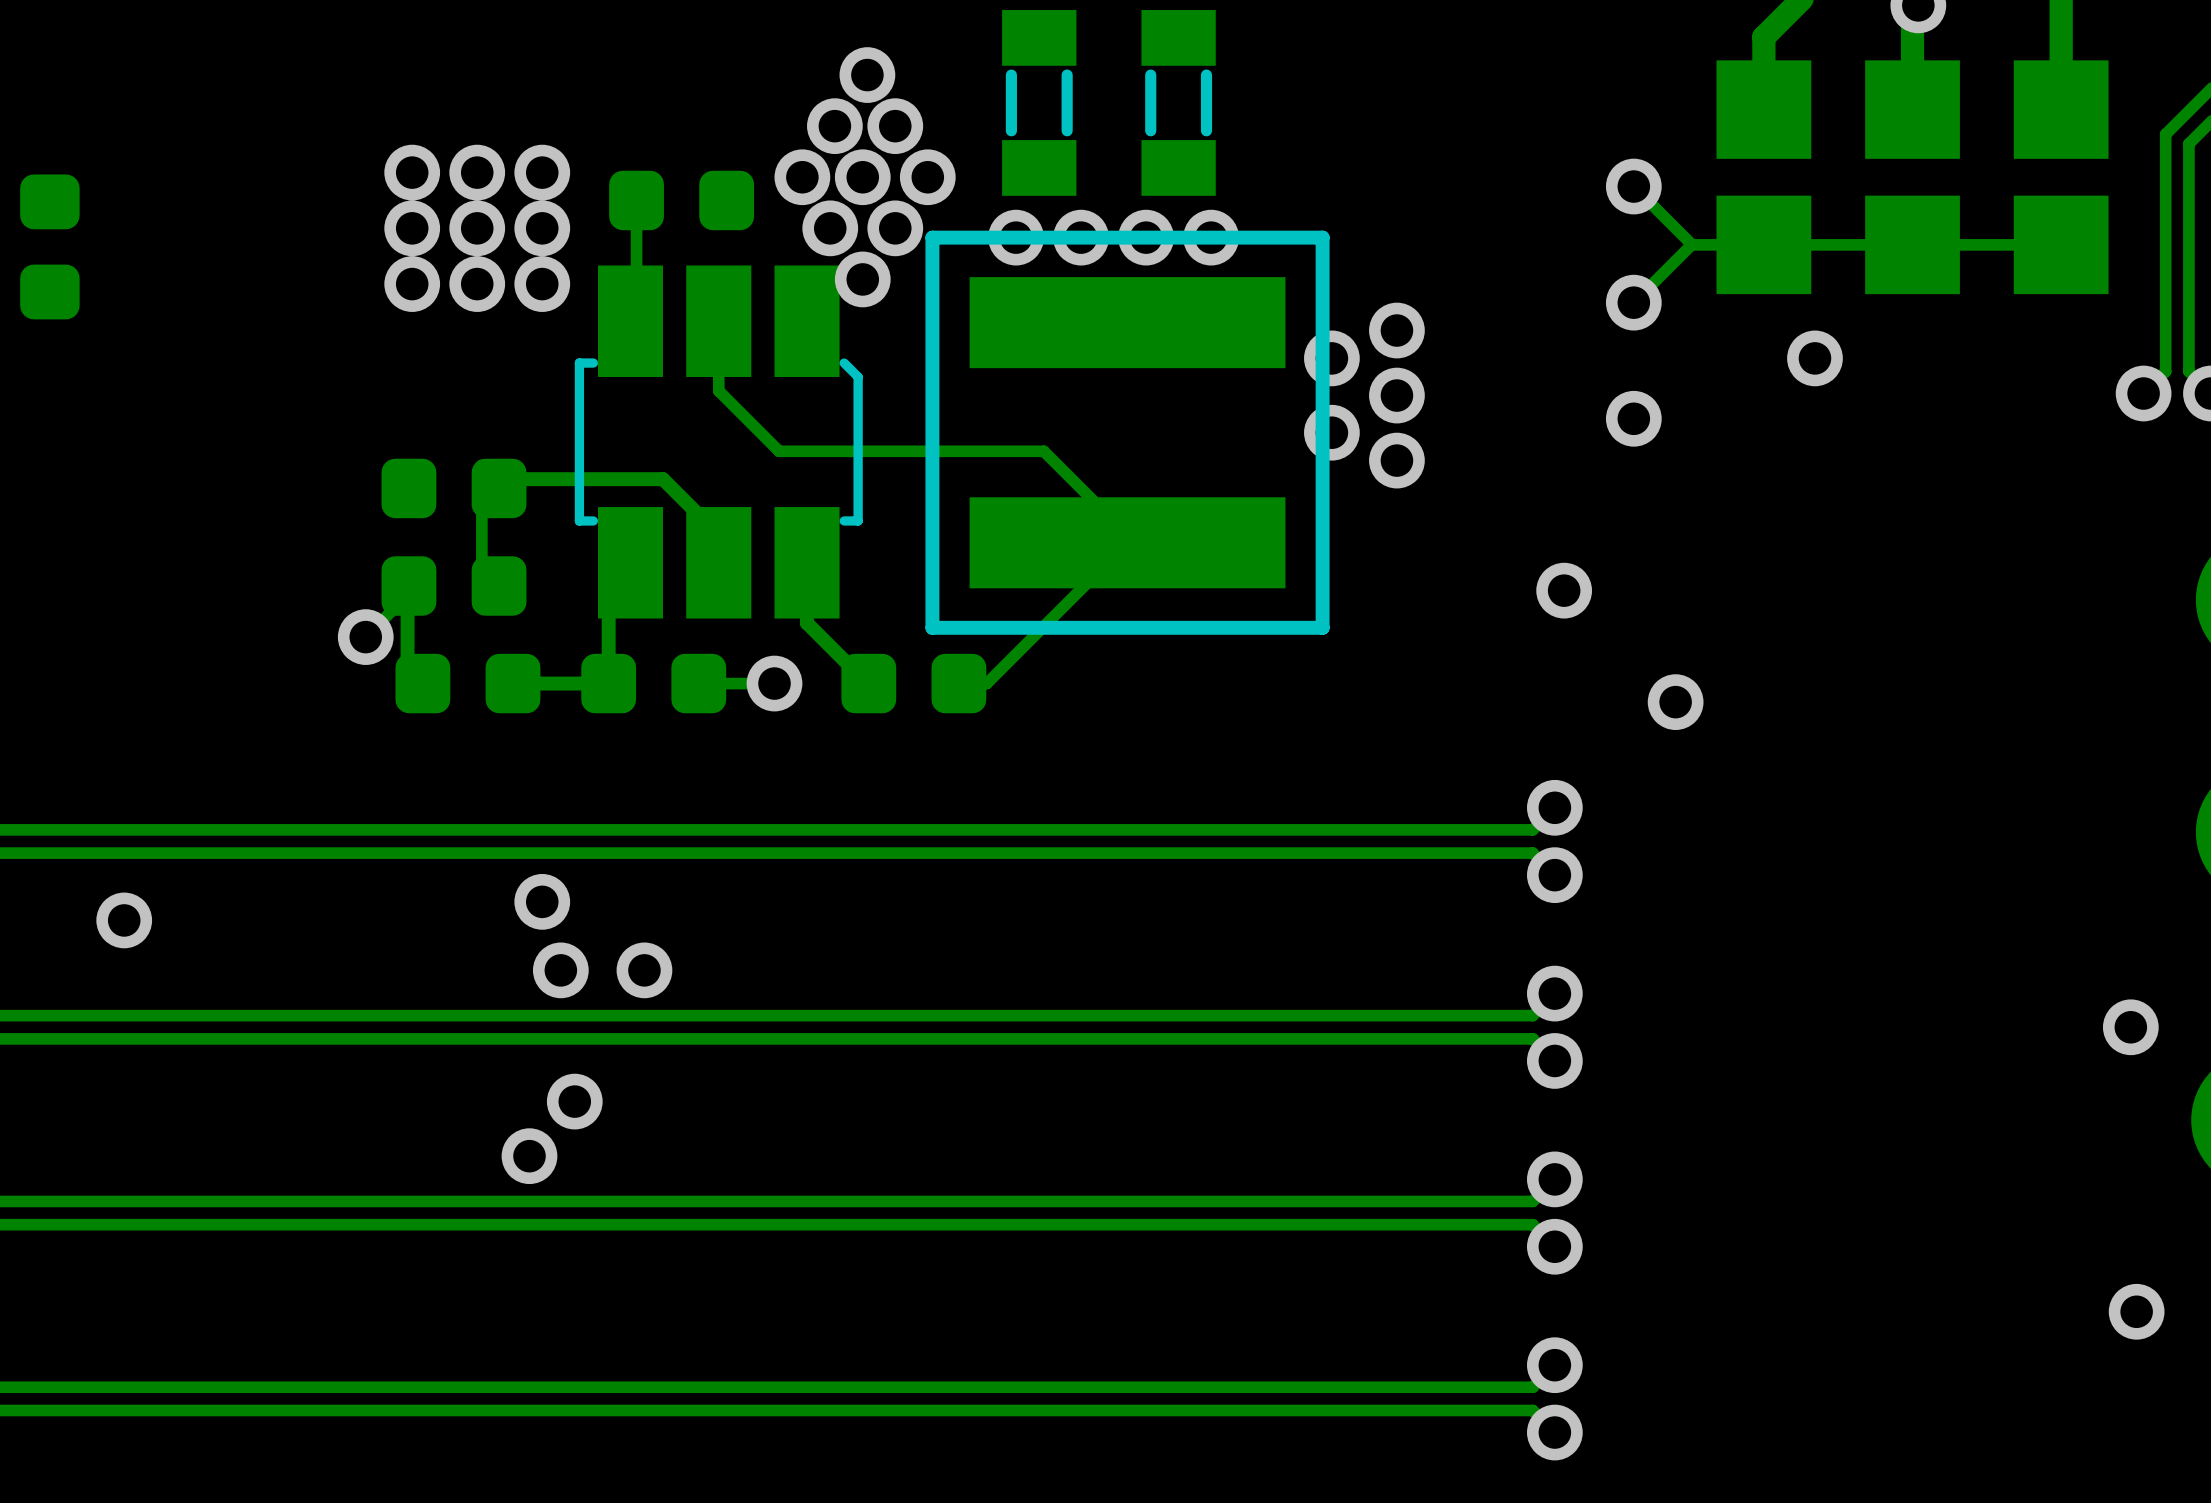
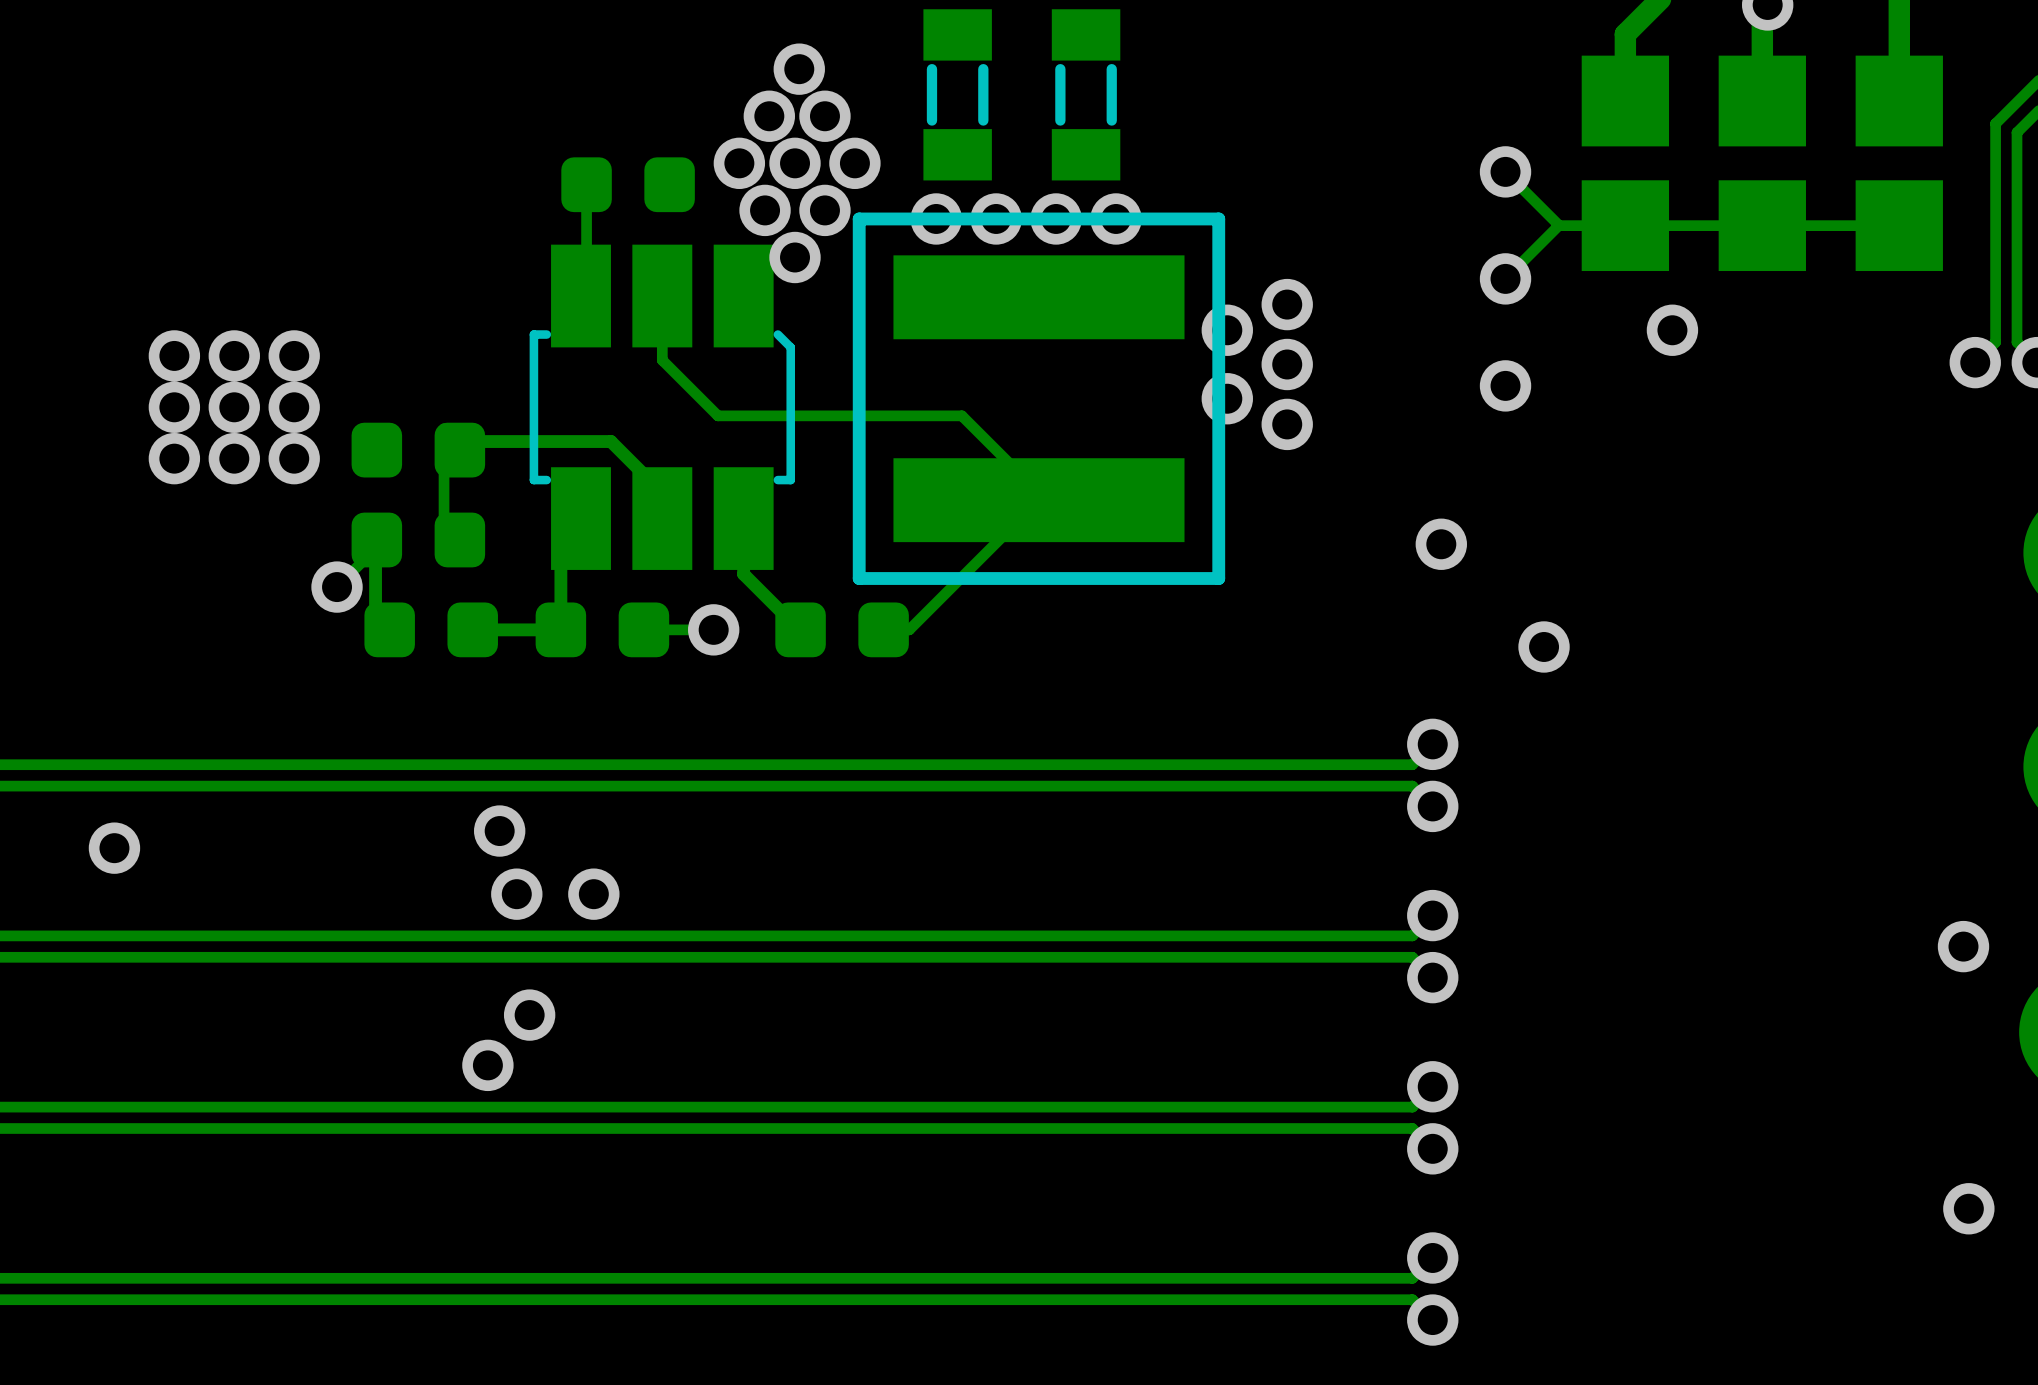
via: (412, 172) -> none
via: (477, 172) -> none
via: (542, 172) -> none
via: (412, 228) -> none
via: (477, 228) -> none
via: (542, 228) -> none
part: (49, 246) -> none
via: (412, 284) -> none
via: (477, 284) -> none
via: (542, 284) -> none
via: none -> (174, 355)
via: none -> (234, 355)
via: none -> (294, 355)
via: none -> (174, 407)
via: none -> (234, 407)
via: none -> (294, 407)
via: none -> (174, 458)
via: none -> (234, 458)
via: none -> (294, 458)

